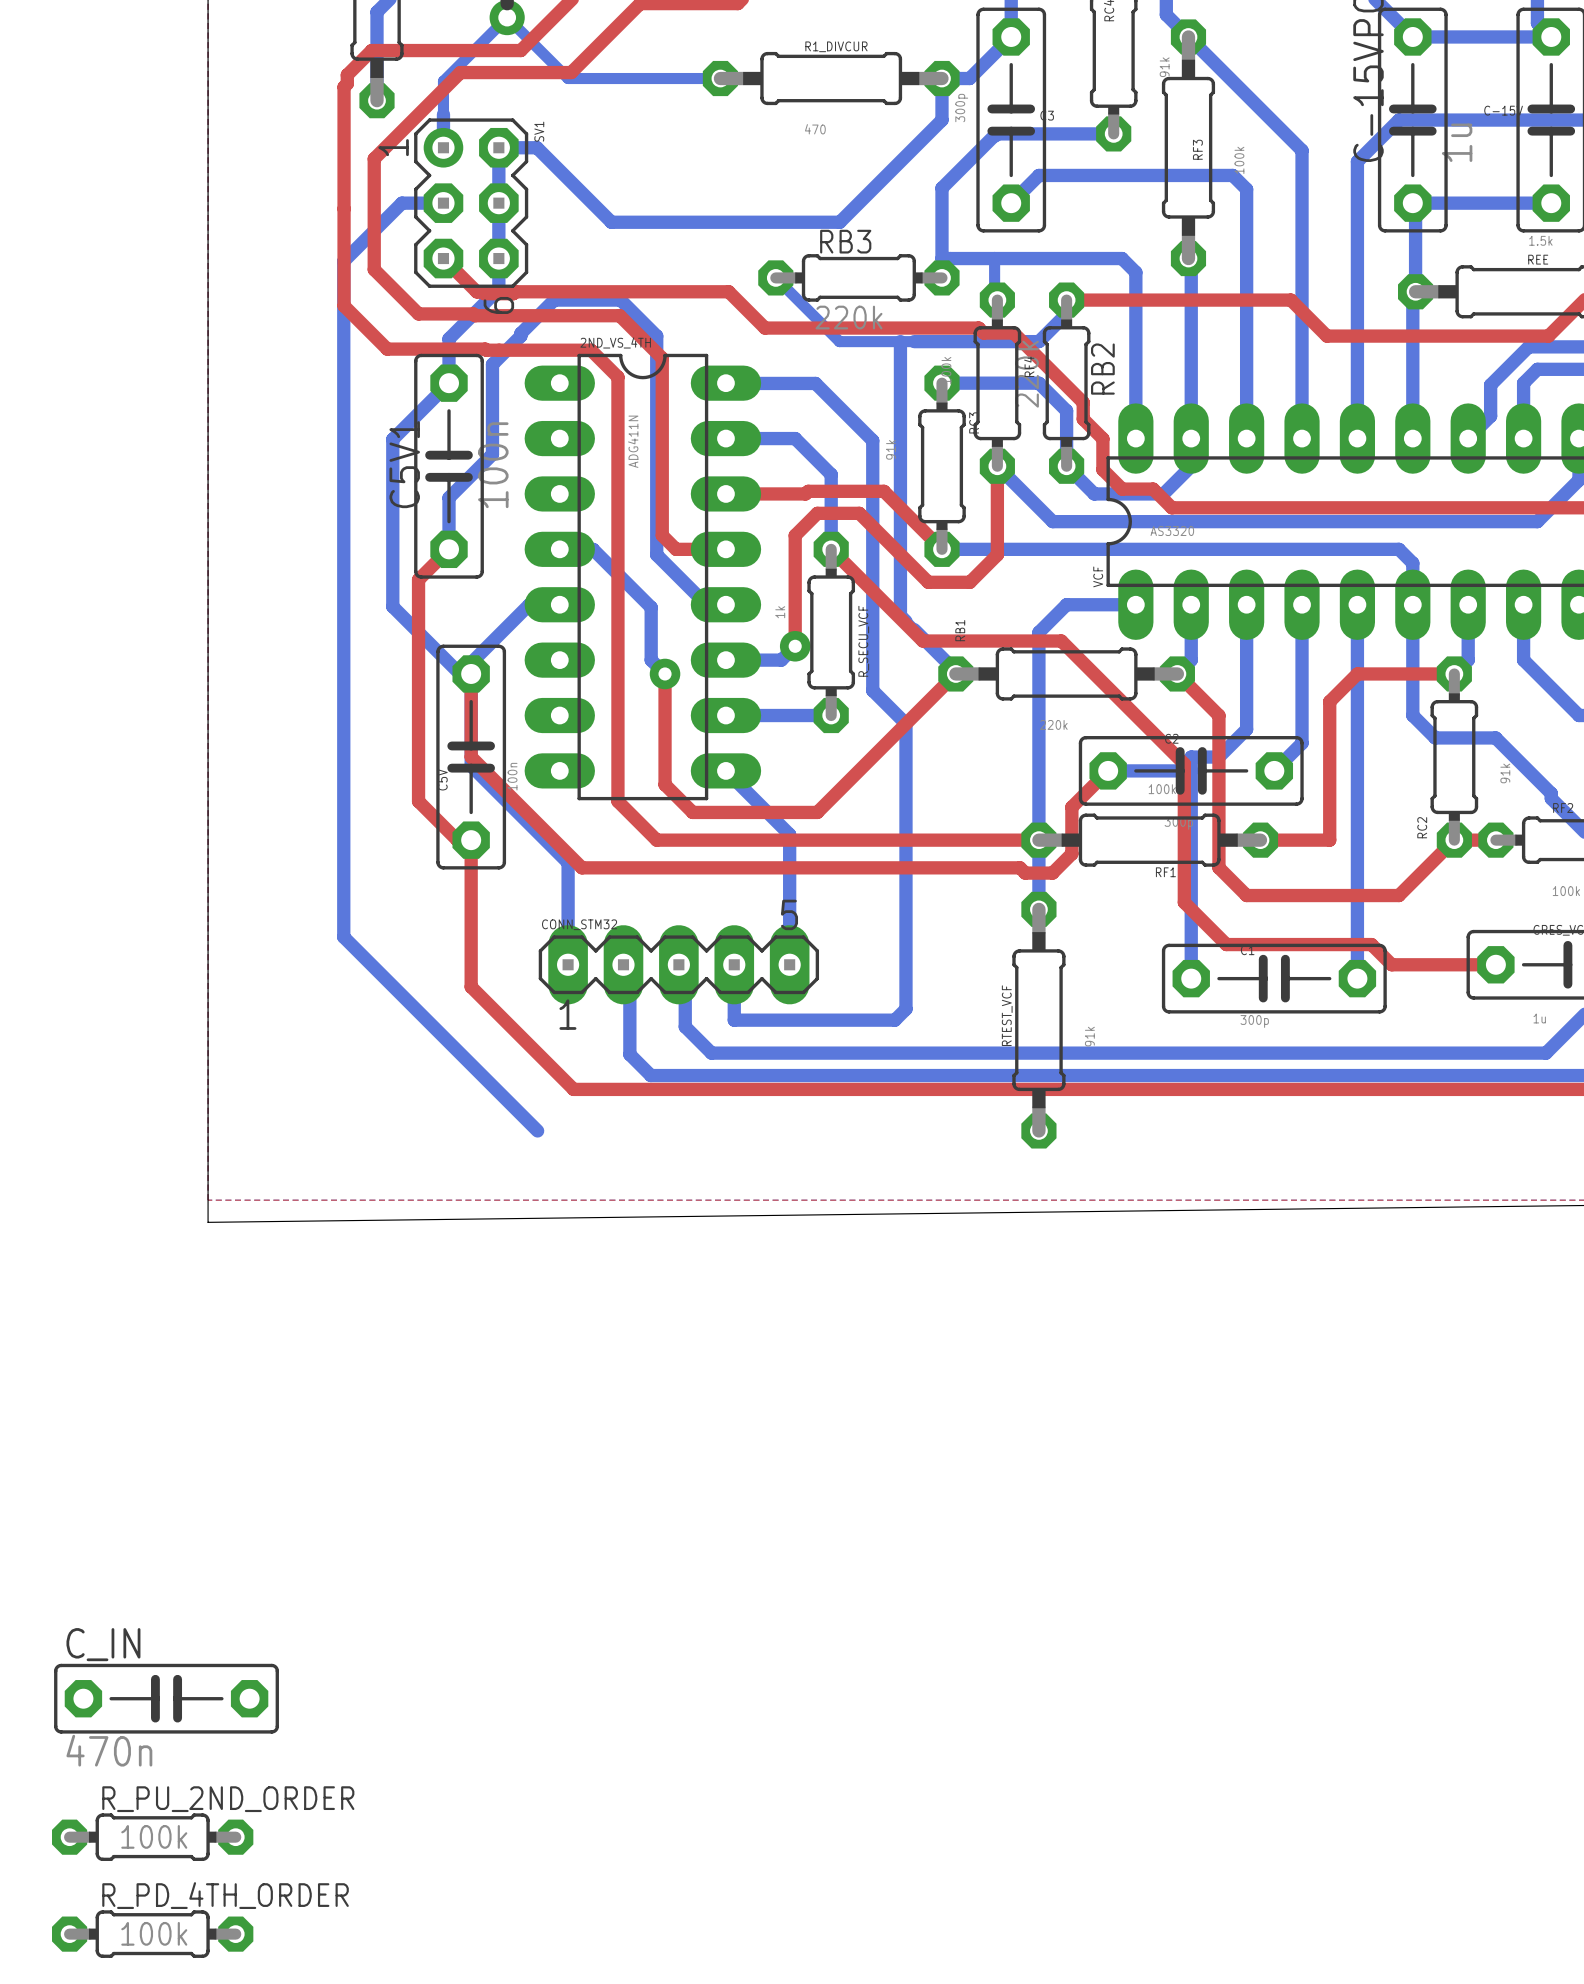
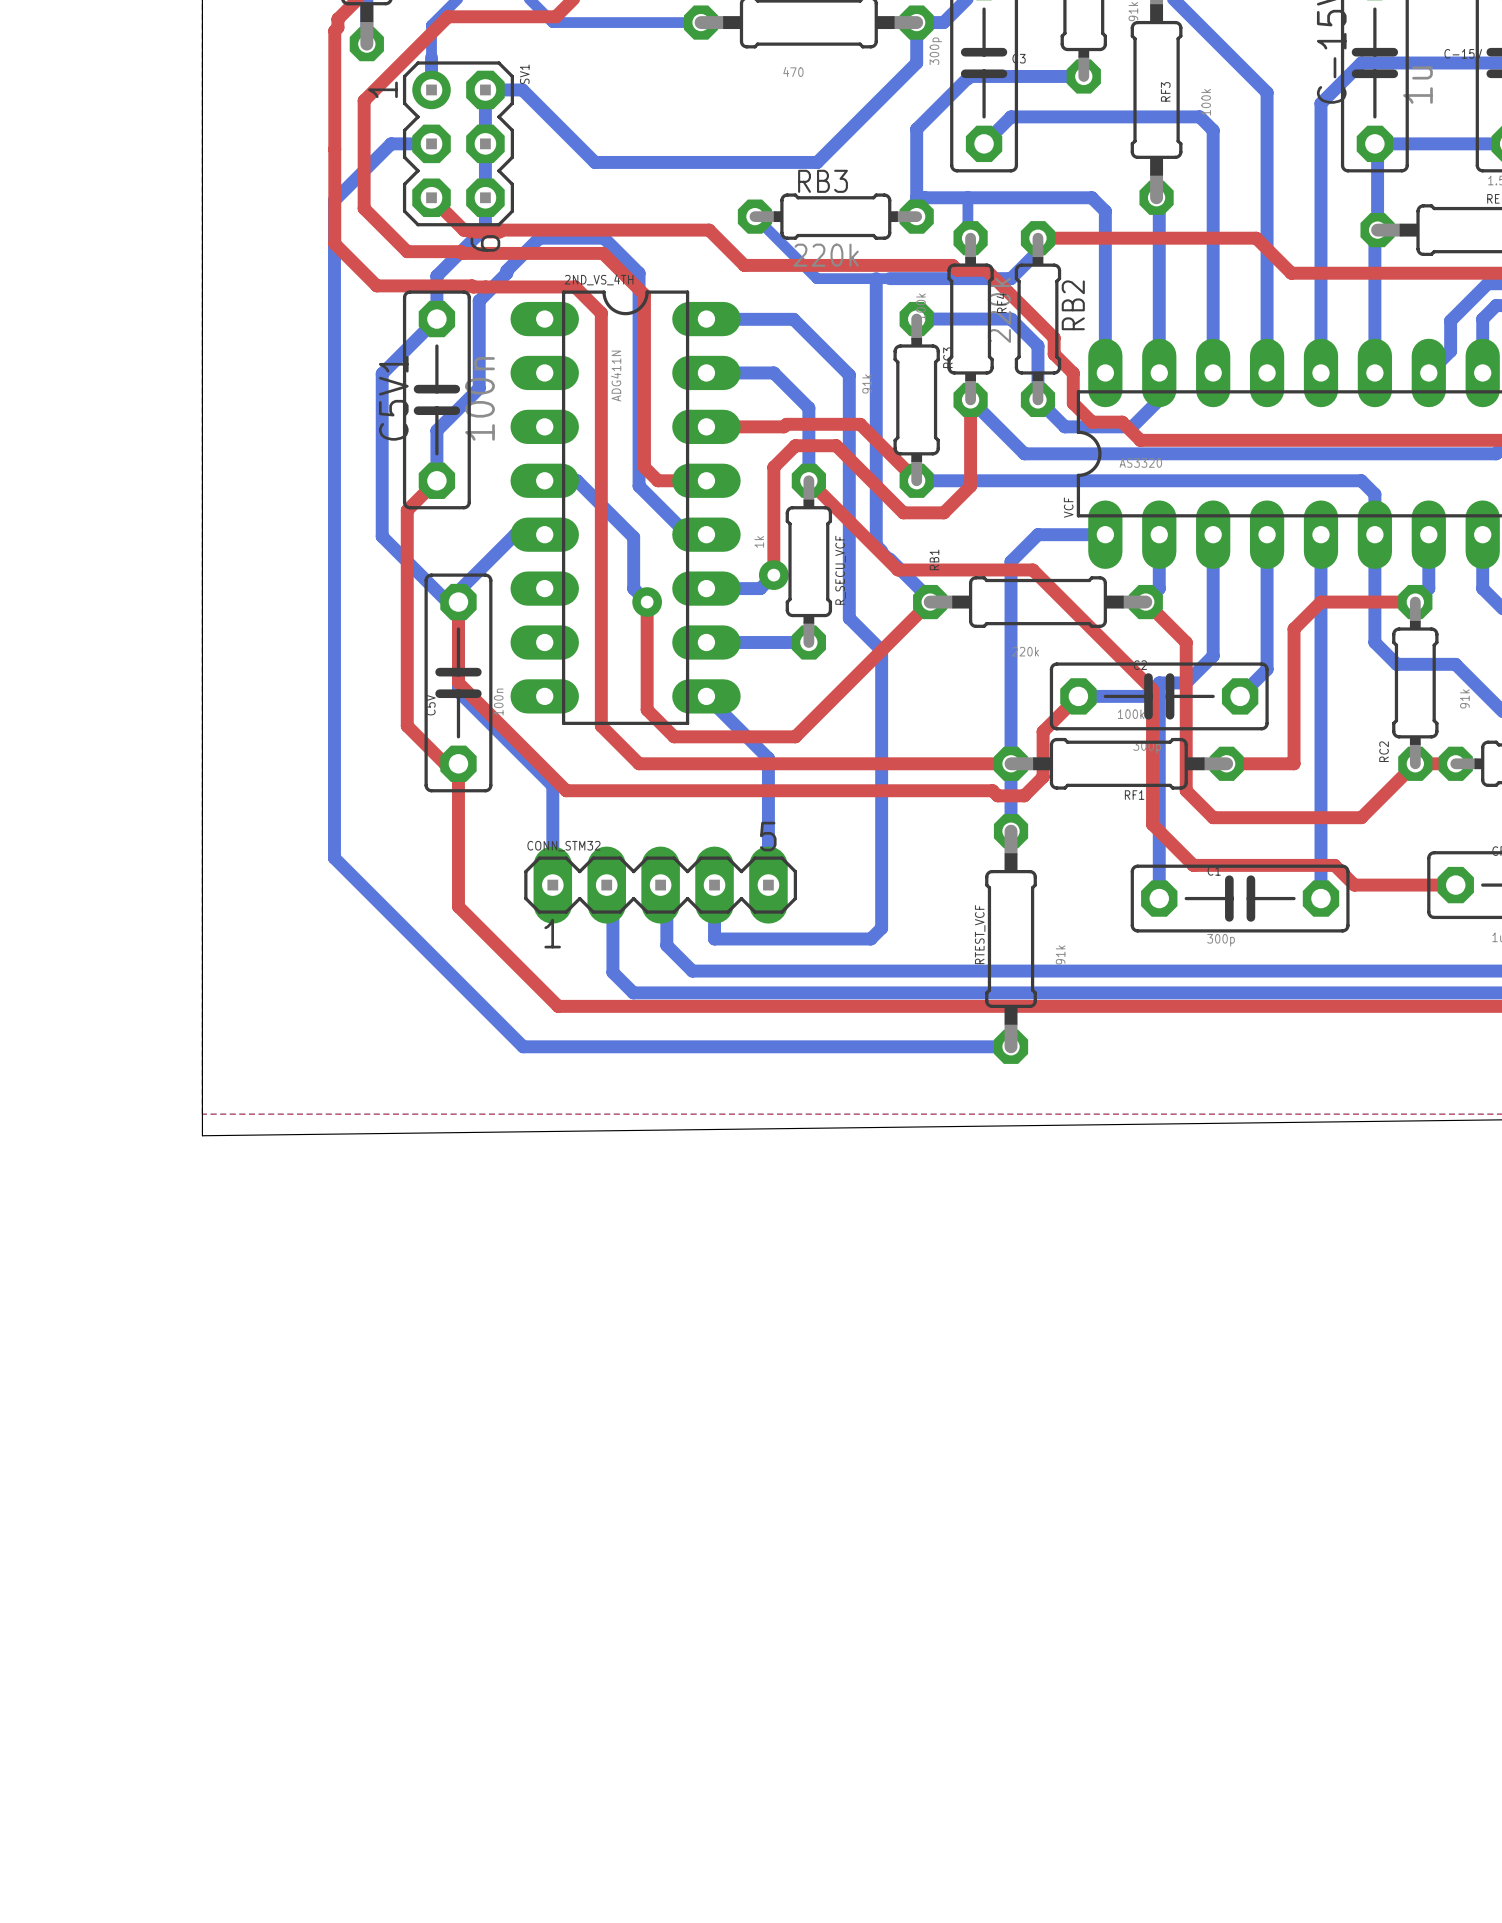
bottom track: none -> (523, 1046) (1011, 1046)
C_IN: 470n (166, 1698) -> none
R_PU_2ND_ORDER: 100k (152, 1837) -> none
R_PD_4TH_ORDER: 100k (152, 1934) -> none

